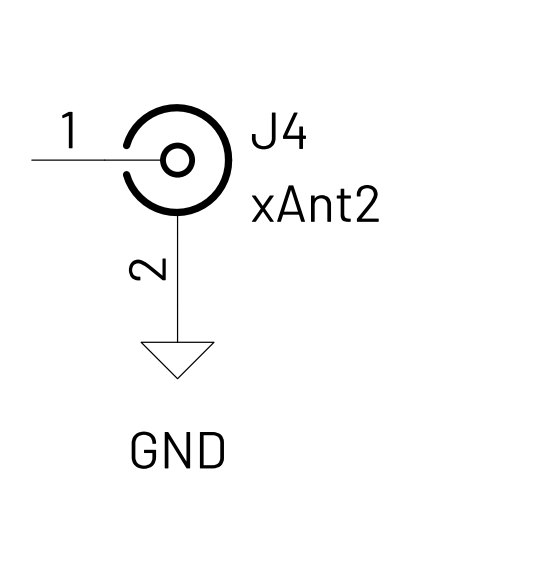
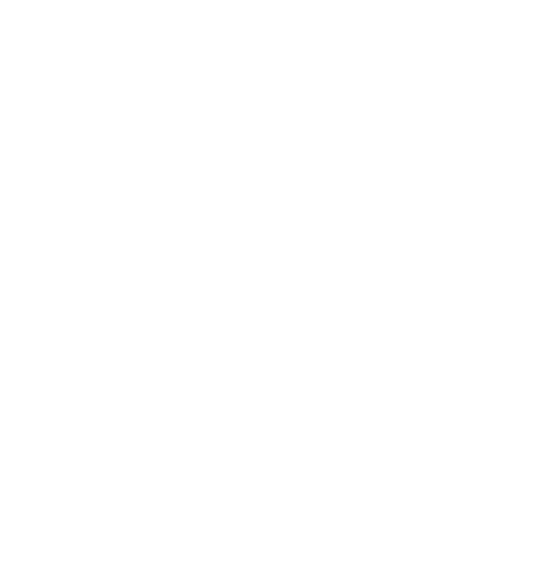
J4: xAnt2 (132, 204) -> none
power symbol: GND (177, 342) -> none

